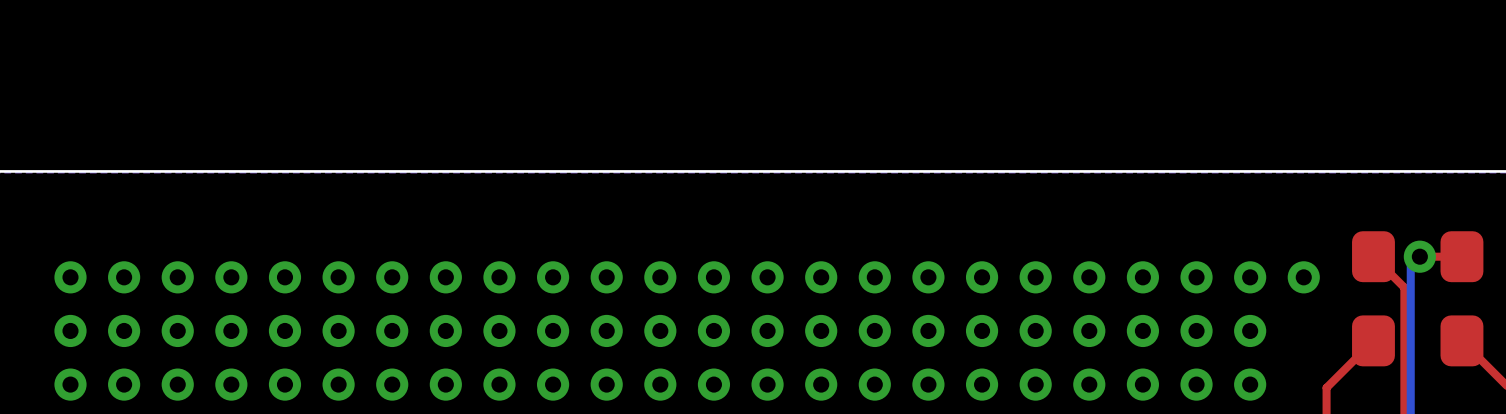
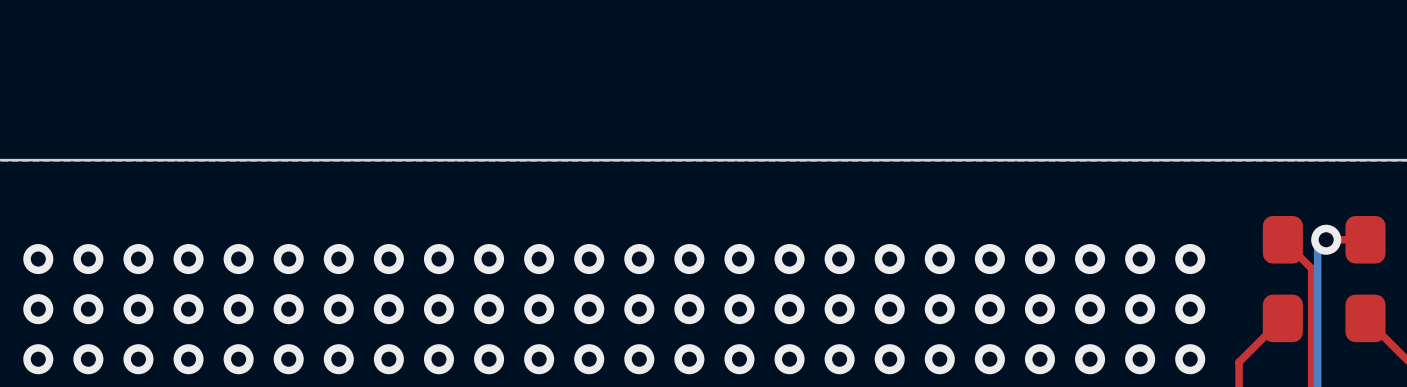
via: none -> (38, 259)
via: (70, 277) -> none
via: none -> (88, 259)
via: (124, 277) -> none
via: none -> (138, 259)
via: (177, 277) -> none
via: none -> (188, 259)
via: (231, 277) -> none
via: none -> (238, 259)
via: (284, 277) -> none
via: none -> (288, 259)
via: (338, 277) -> none
via: none -> (338, 259)
via: (392, 277) -> none
via: none -> (388, 259)
via: (445, 277) -> none
via: none -> (438, 259)
via: (499, 277) -> none
via: none -> (489, 259)
via: (553, 277) -> none
via: none -> (539, 259)
via: (606, 277) -> none
via: none -> (589, 259)
via: (660, 277) -> none
via: none -> (639, 259)
via: (713, 277) -> none
via: none -> (689, 259)
via: (767, 277) -> none
via: none -> (739, 259)
via: (821, 277) -> none
via: none -> (789, 259)
via: (874, 277) -> none
via: none -> (839, 259)
via: (928, 277) -> none
via: none -> (889, 259)
via: (982, 277) -> none
via: none -> (939, 259)
via: (1035, 277) -> none
via: none -> (989, 259)
via: (1089, 277) -> none
via: none -> (1039, 259)
via: (1142, 277) -> none
via: none -> (1090, 259)
via: (1196, 277) -> none
via: none -> (1140, 259)
via: (1250, 277) -> none
via: none -> (1190, 259)
via: (1303, 277) -> none
via: none -> (38, 309)
via: (70, 330) -> none
via: none -> (88, 309)
via: (124, 330) -> none
via: none -> (138, 309)
via: (177, 330) -> none
via: none -> (188, 309)
via: (231, 330) -> none
via: none -> (238, 309)
via: (284, 330) -> none
via: none -> (288, 309)
via: (338, 330) -> none
via: none -> (338, 309)
via: (392, 330) -> none
via: none -> (388, 309)
via: (445, 330) -> none
via: none -> (438, 309)
via: (499, 330) -> none
via: none -> (489, 309)
via: (553, 330) -> none
via: none -> (539, 309)
via: (606, 330) -> none
via: none -> (589, 309)
via: (660, 330) -> none
via: none -> (639, 309)
via: (713, 330) -> none
via: none -> (689, 309)
via: (767, 330) -> none
via: none -> (739, 309)
via: (821, 330) -> none
via: none -> (789, 309)
via: (874, 330) -> none
via: none -> (839, 309)
via: (928, 330) -> none
via: none -> (889, 309)
via: (982, 330) -> none
via: none -> (939, 309)
via: (1035, 330) -> none
via: none -> (989, 309)
via: (1089, 330) -> none
via: none -> (1039, 309)
via: (1142, 330) -> none
via: none -> (1090, 309)
via: (1196, 330) -> none
via: none -> (1140, 309)
via: (1250, 330) -> none
via: none -> (1190, 309)
via: none -> (38, 359)
via: (70, 384) -> none
via: none -> (88, 359)
via: (124, 384) -> none
via: none -> (138, 359)
via: (177, 384) -> none
via: none -> (188, 359)
via: (231, 384) -> none
via: none -> (238, 359)
via: (284, 384) -> none
via: none -> (288, 359)
via: (338, 384) -> none
via: none -> (338, 359)
via: (392, 384) -> none
via: none -> (388, 359)
via: (445, 384) -> none
via: none -> (438, 359)
via: (499, 384) -> none
via: none -> (489, 359)
via: (553, 384) -> none
via: none -> (539, 359)
via: (606, 384) -> none
via: none -> (589, 359)
via: (660, 384) -> none
via: none -> (639, 359)
via: (713, 384) -> none
via: none -> (689, 359)
via: (767, 384) -> none
via: none -> (739, 359)
via: (821, 384) -> none
via: none -> (789, 359)
via: (874, 384) -> none
via: none -> (839, 359)
via: (928, 384) -> none
via: none -> (889, 359)
via: (982, 384) -> none
via: none -> (939, 359)
via: (1035, 384) -> none
via: none -> (989, 359)
via: (1089, 384) -> none
via: none -> (1039, 359)
via: (1142, 384) -> none
via: none -> (1090, 359)
via: (1196, 384) -> none
via: none -> (1140, 359)
via: (1250, 384) -> none
via: none -> (1190, 359)

